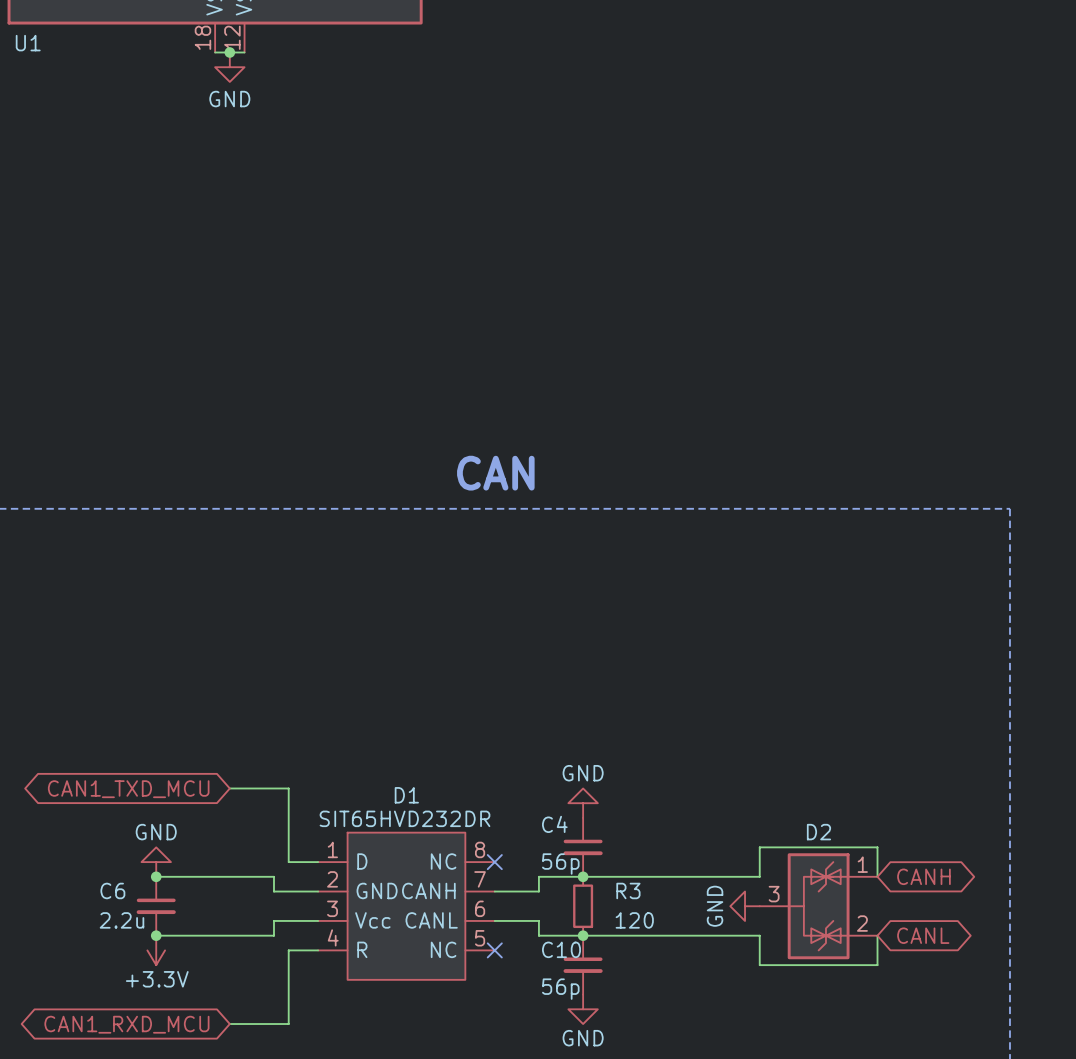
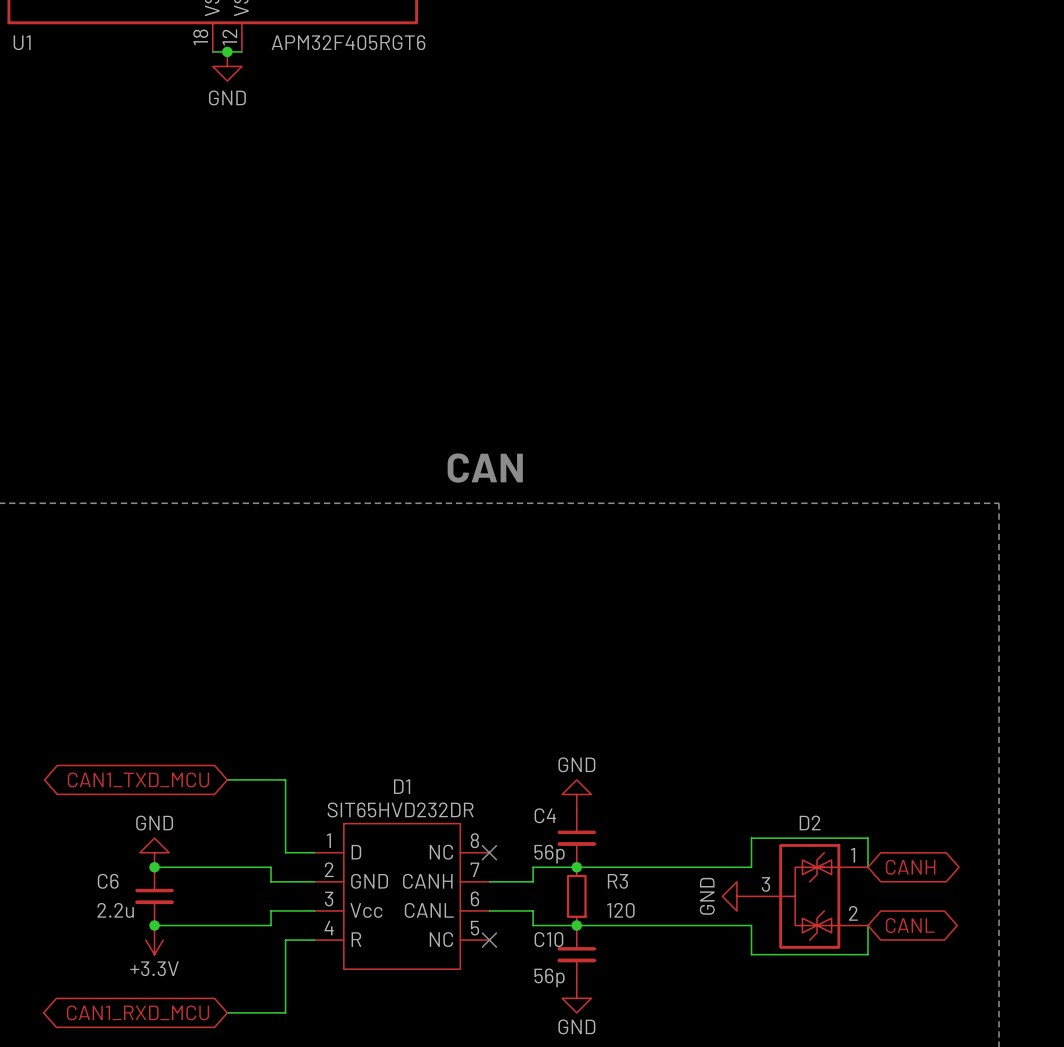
U1 value: none -> APM32F405RGT6 (348, 42)

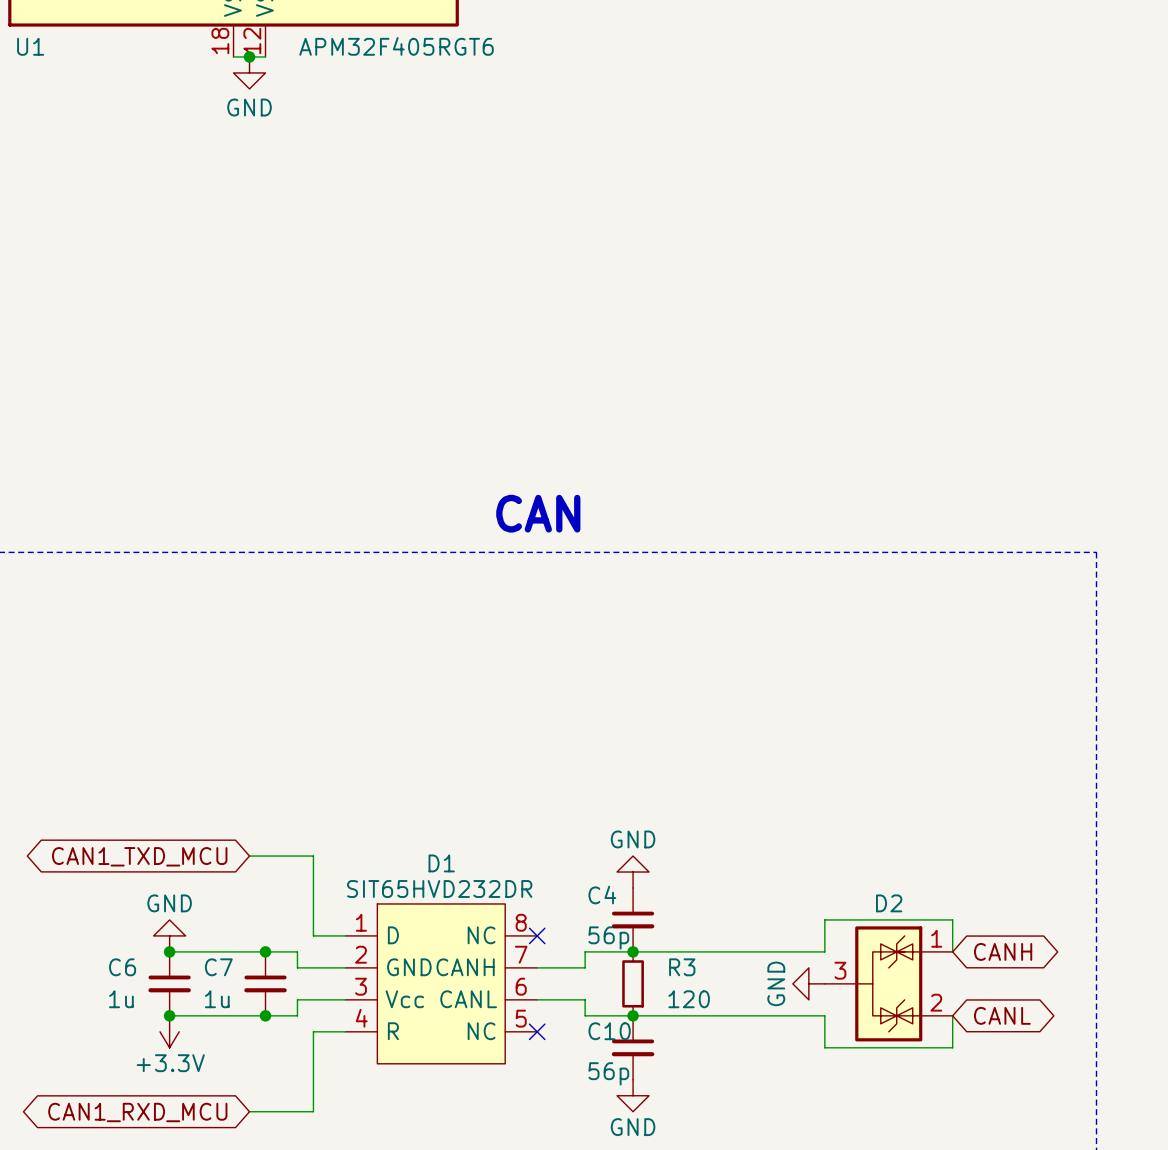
junction: none -> (265, 951)
C7: none -> 1u (265, 983)
C6 value: 2.2u (115, 910) -> 1u (121, 999)
junction: none -> (265, 1015)

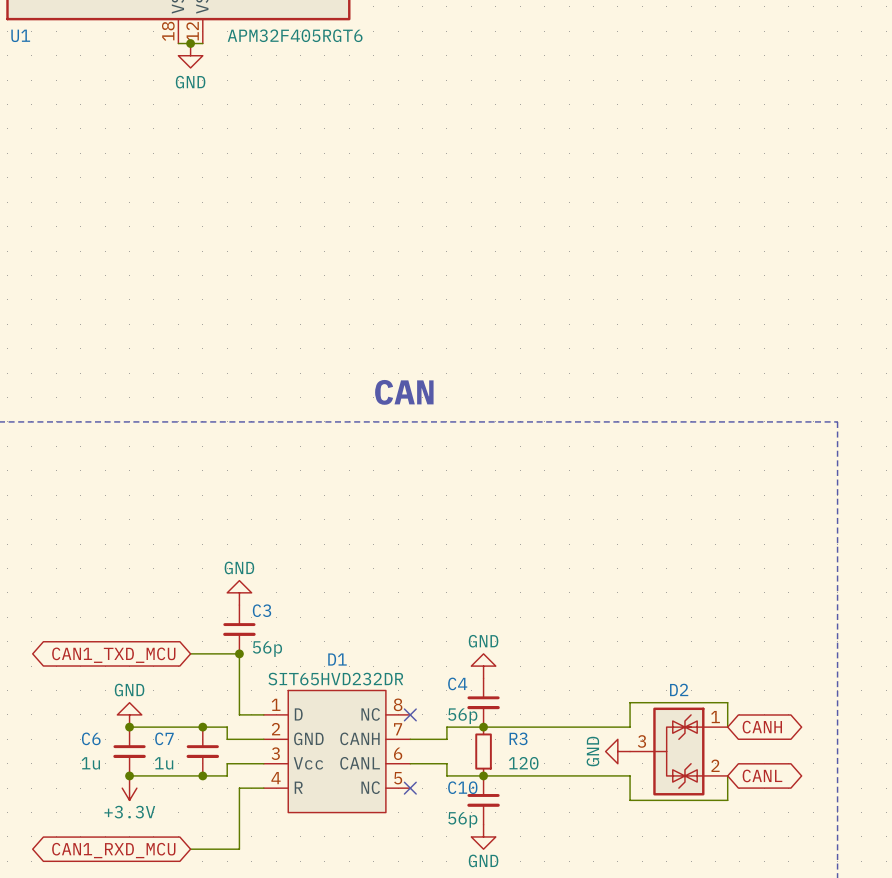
power symbol: none -> GND (239, 592)
C3: none -> 56p (239, 629)
junction: none -> (239, 653)

